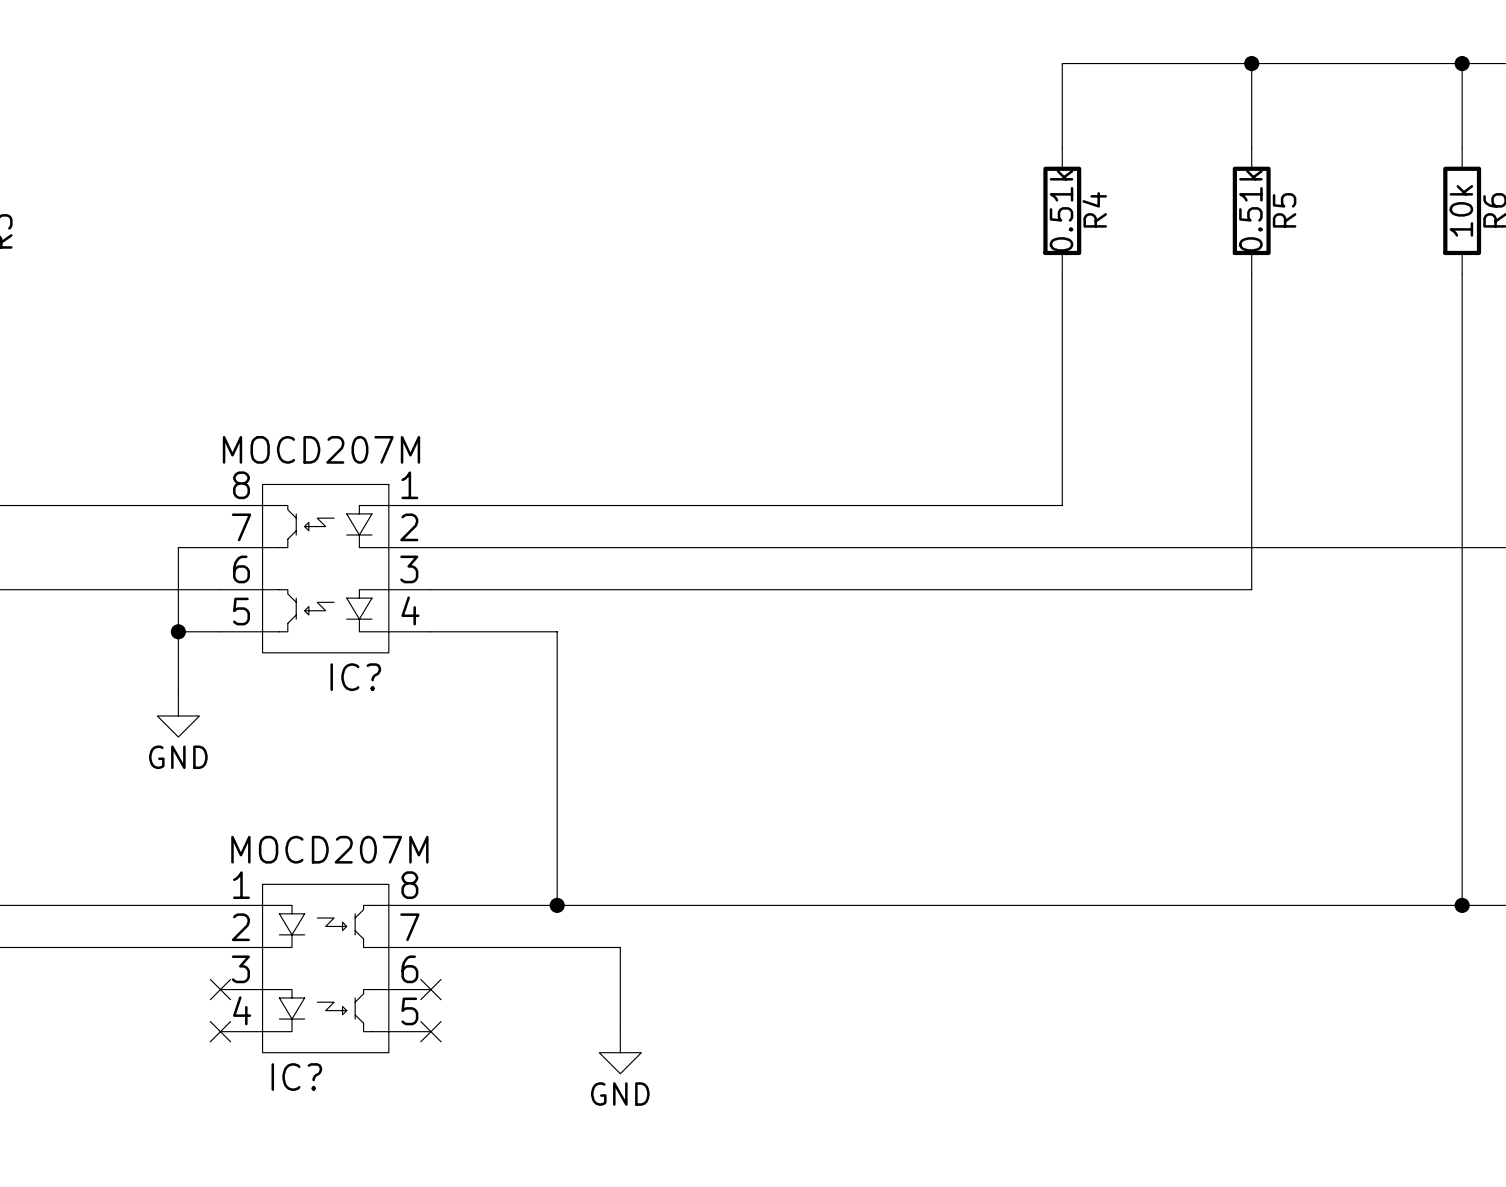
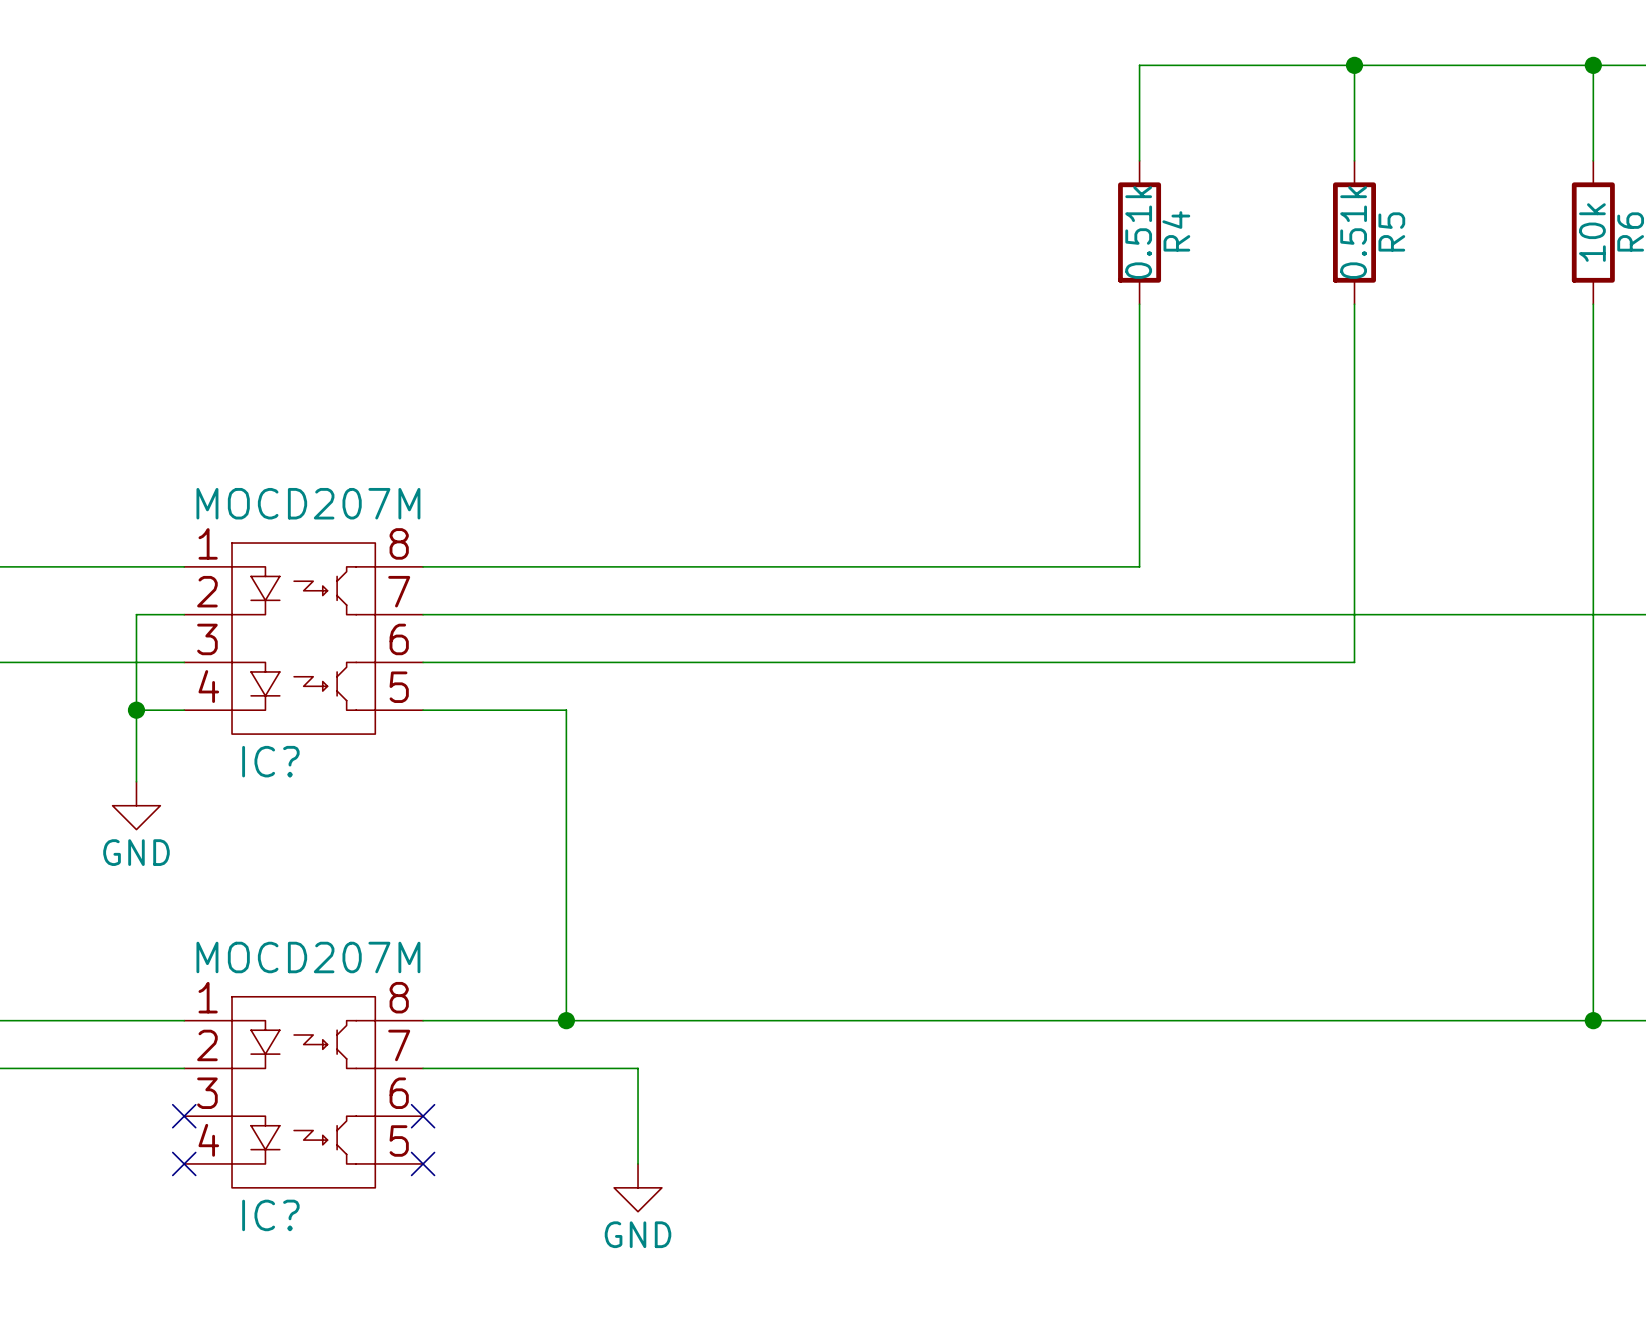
IC? flip: as is (325, 568) -> left-right (303, 638)

